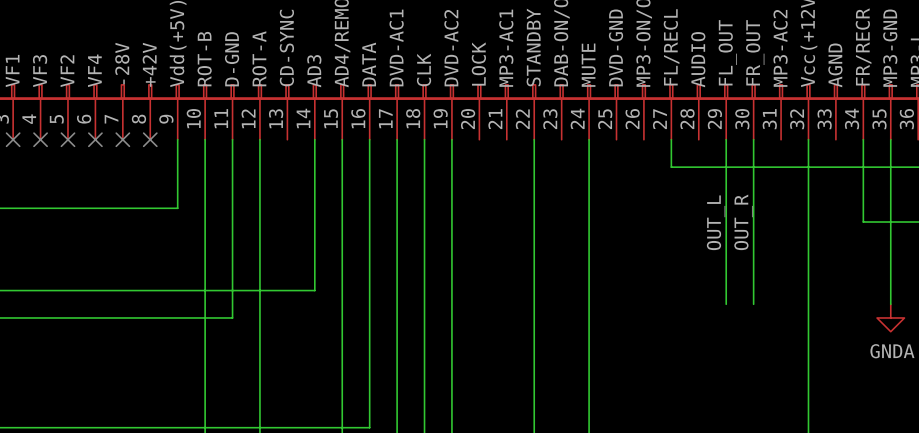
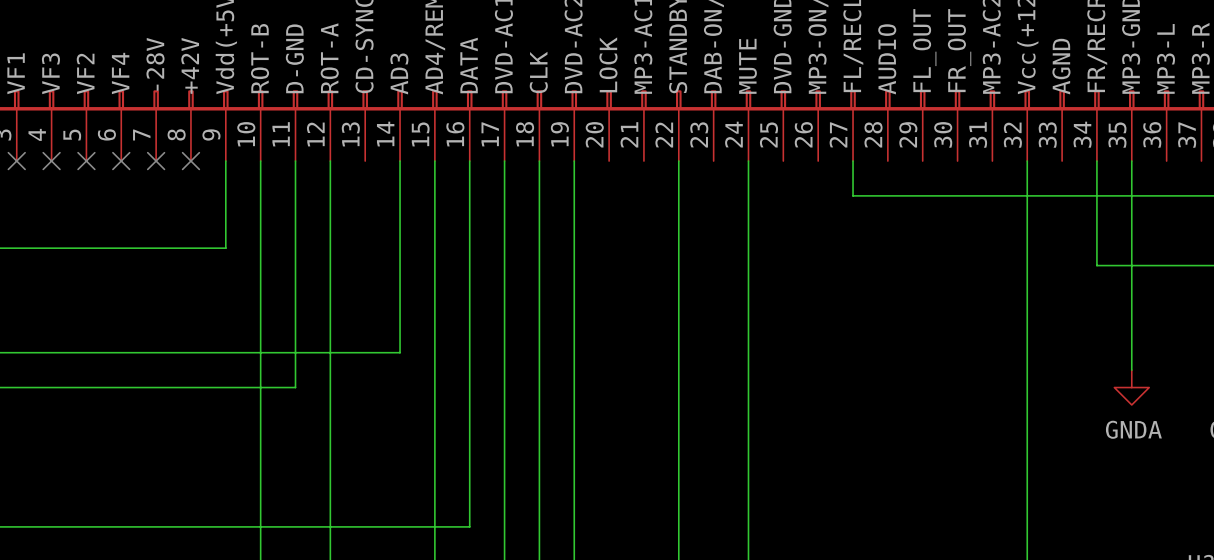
wire: (726, 139) (726, 304) -> none
wire: (753, 139) (753, 304) -> none
label: OUT_L (716, 222) -> none
label: OUT_R (743, 222) -> none

